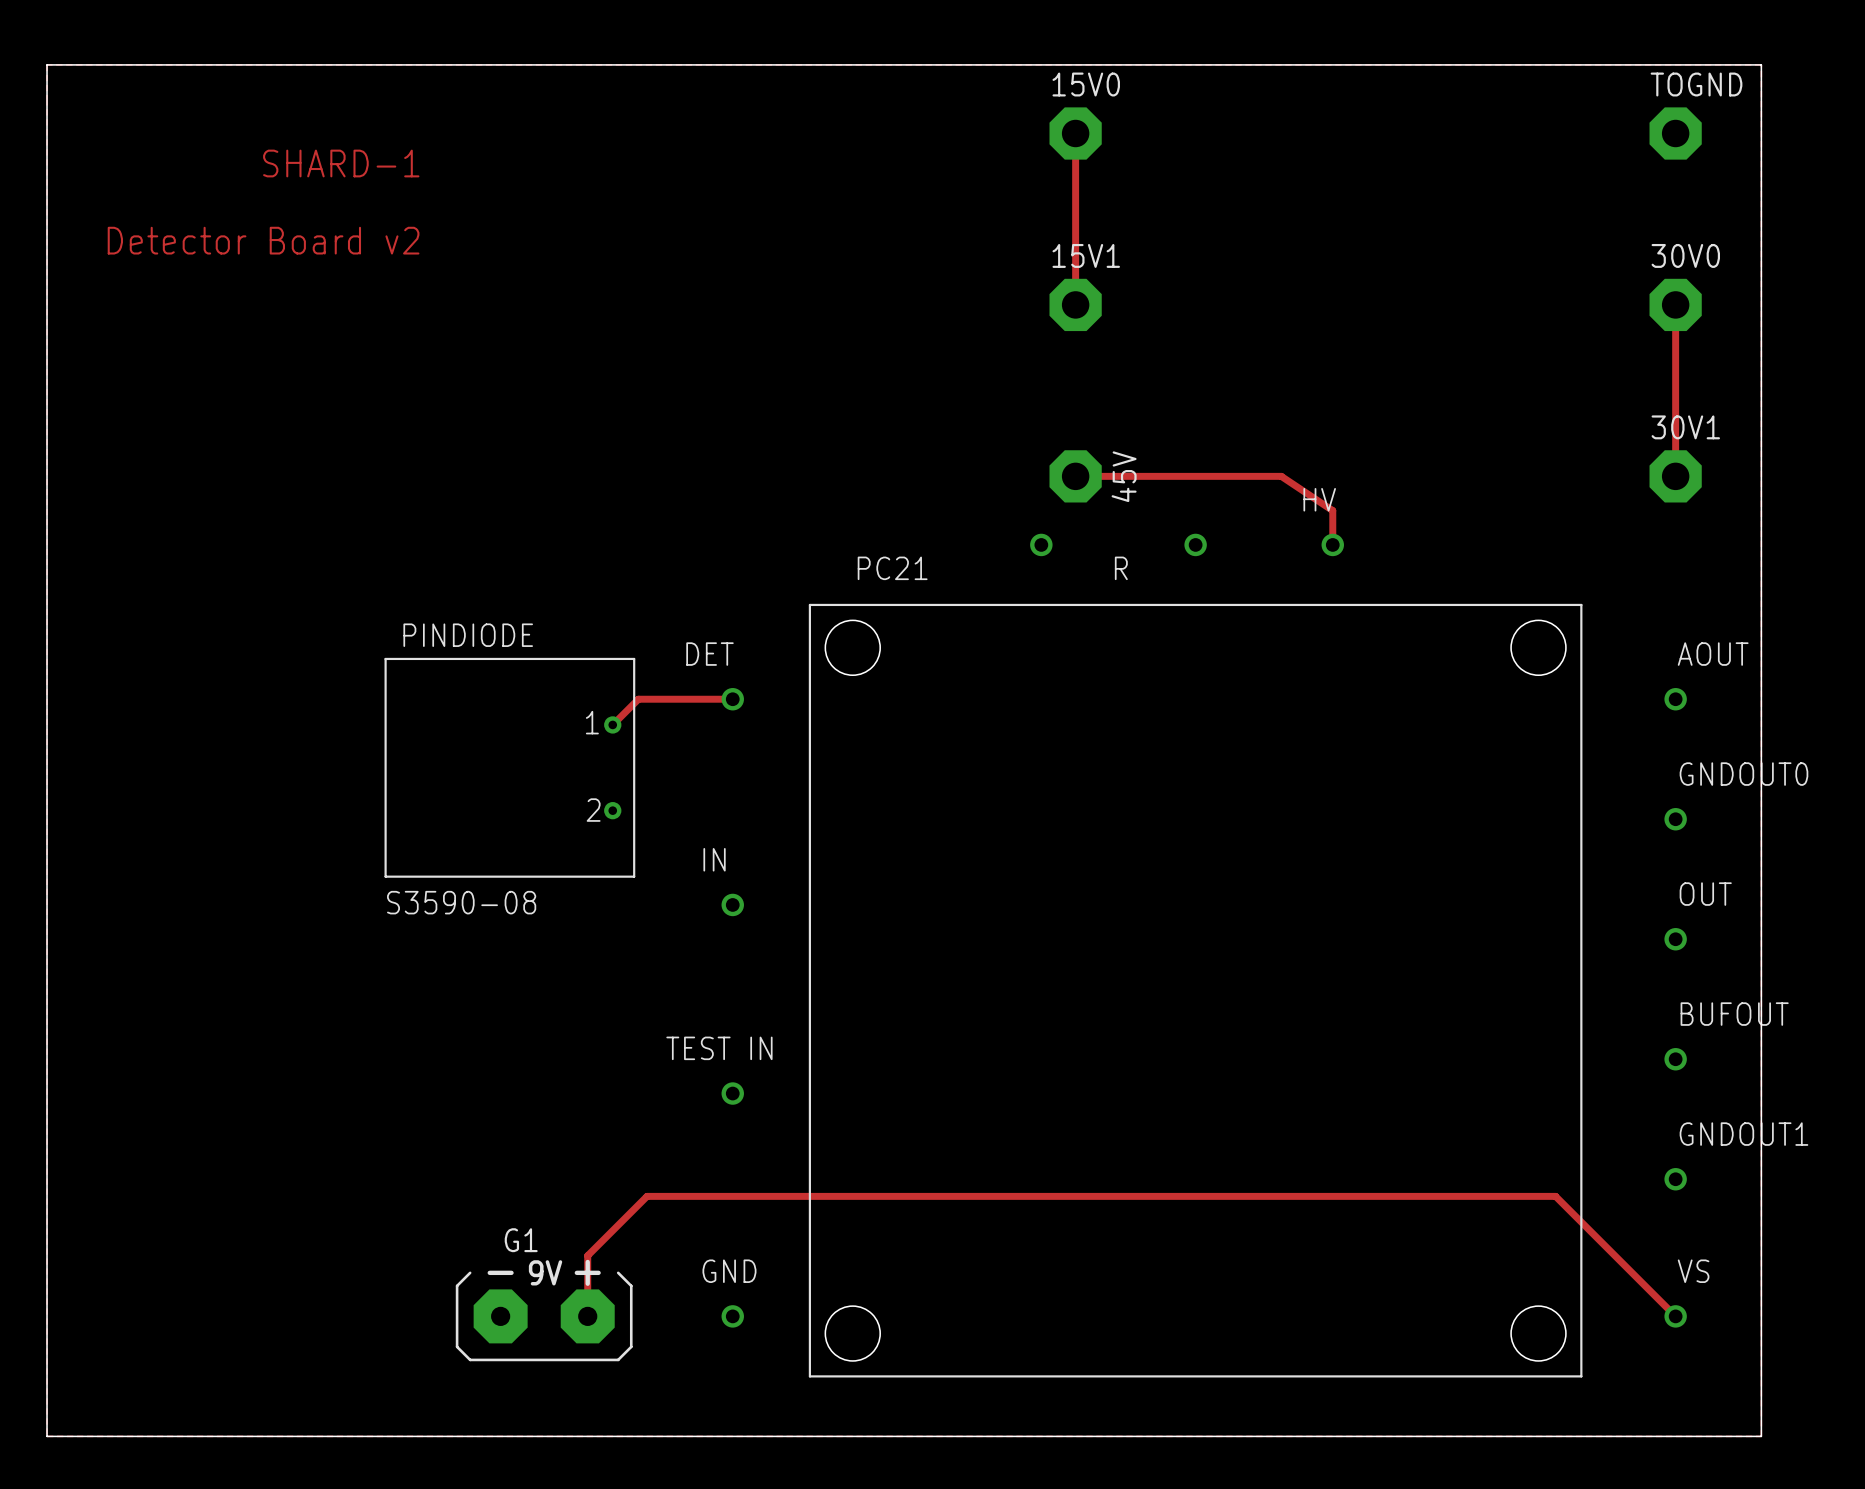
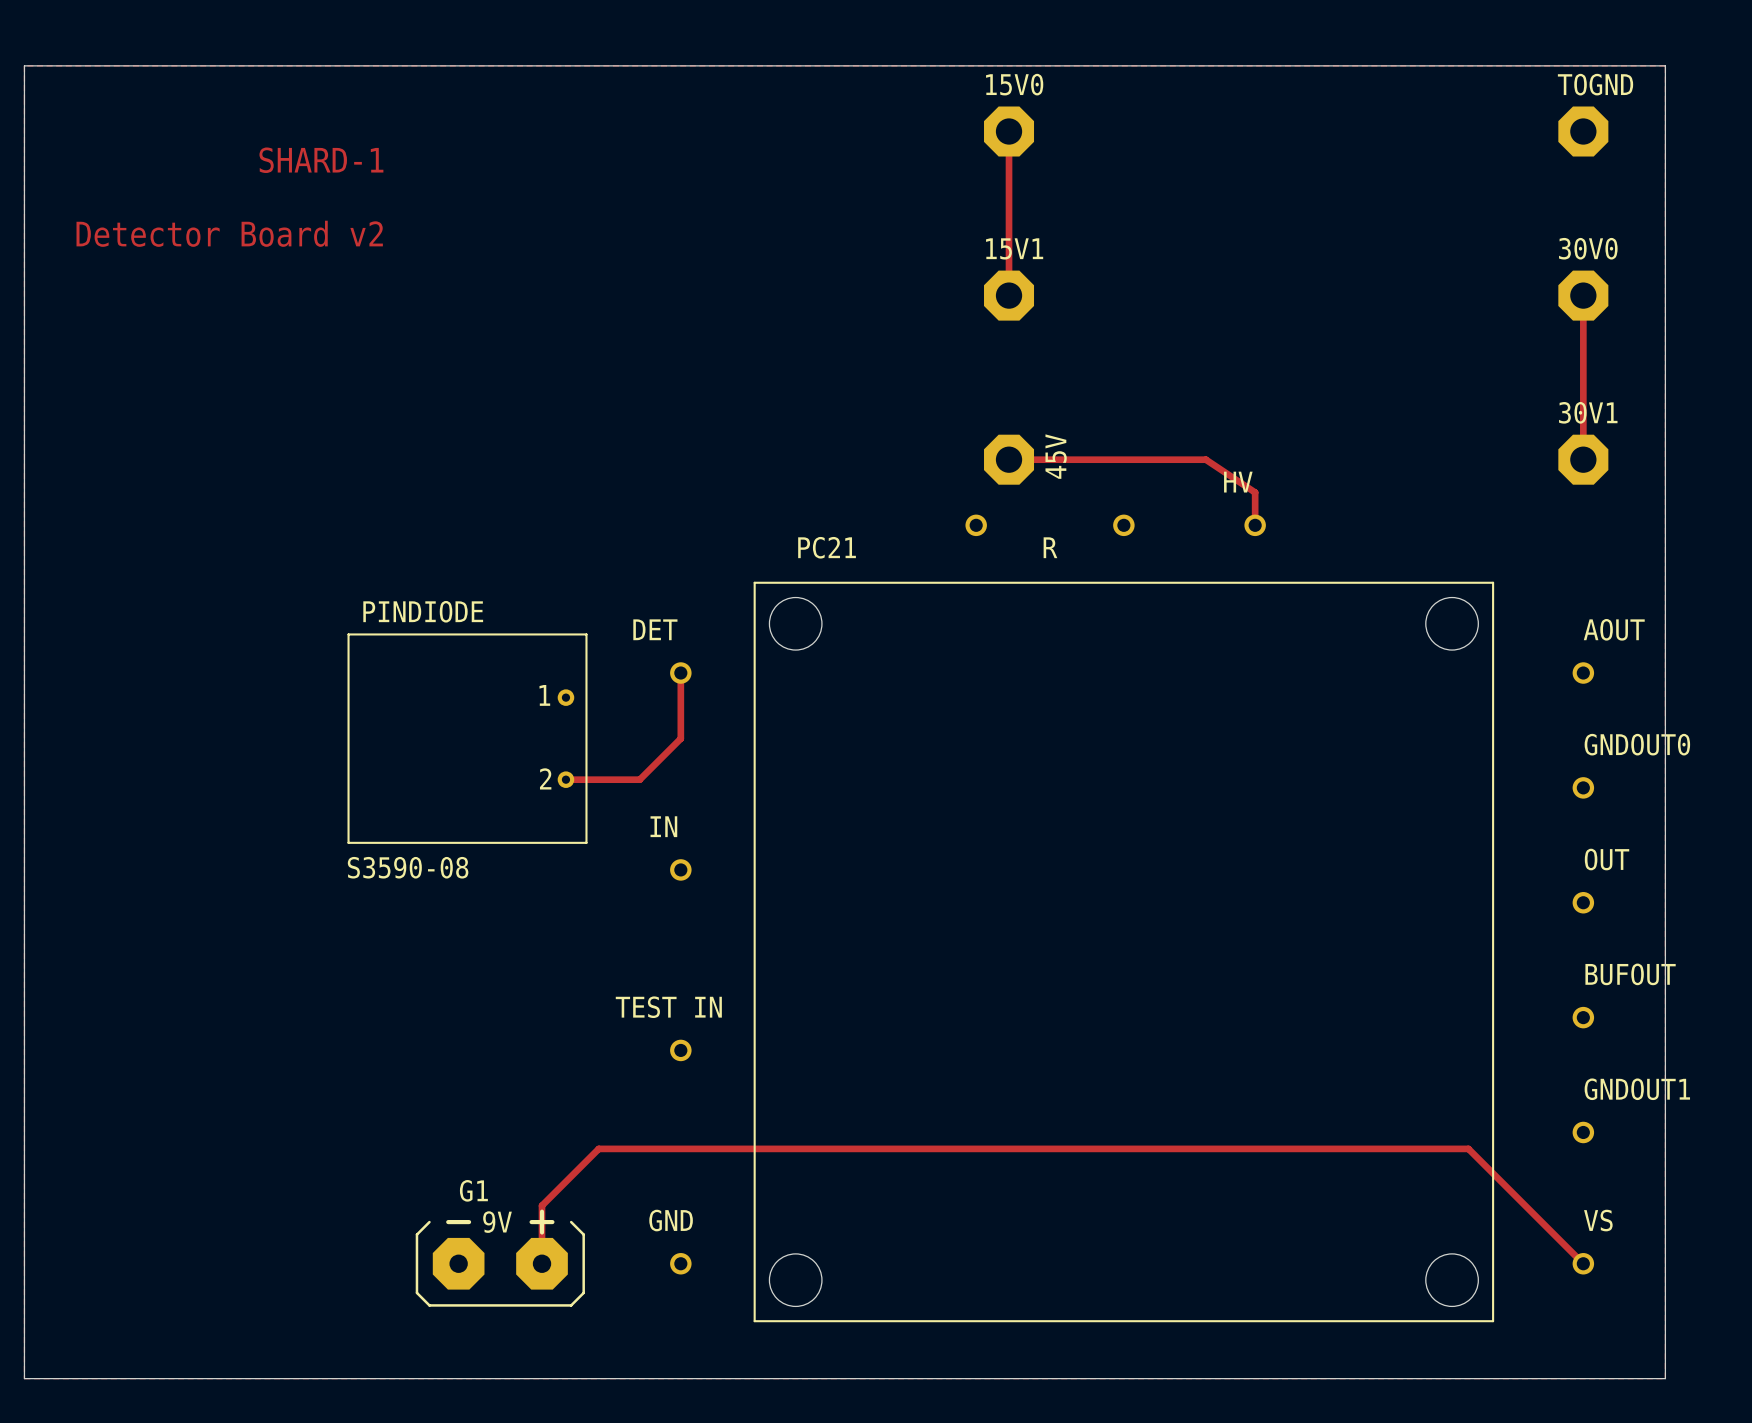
top track: (732, 699) (638, 699) (612, 724) -> (680, 673) (680, 738) (639, 779) (565, 779)

